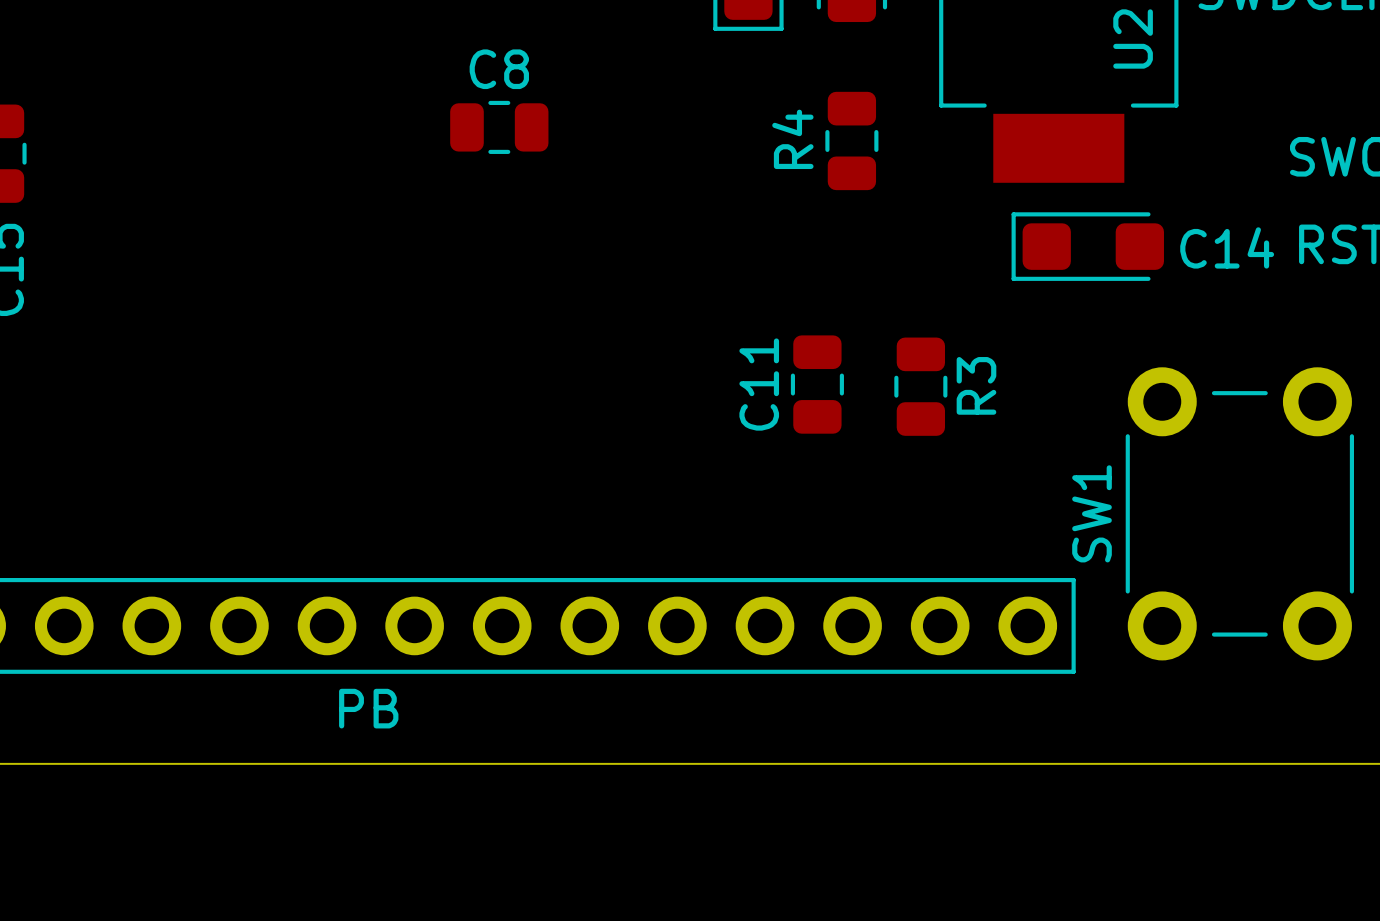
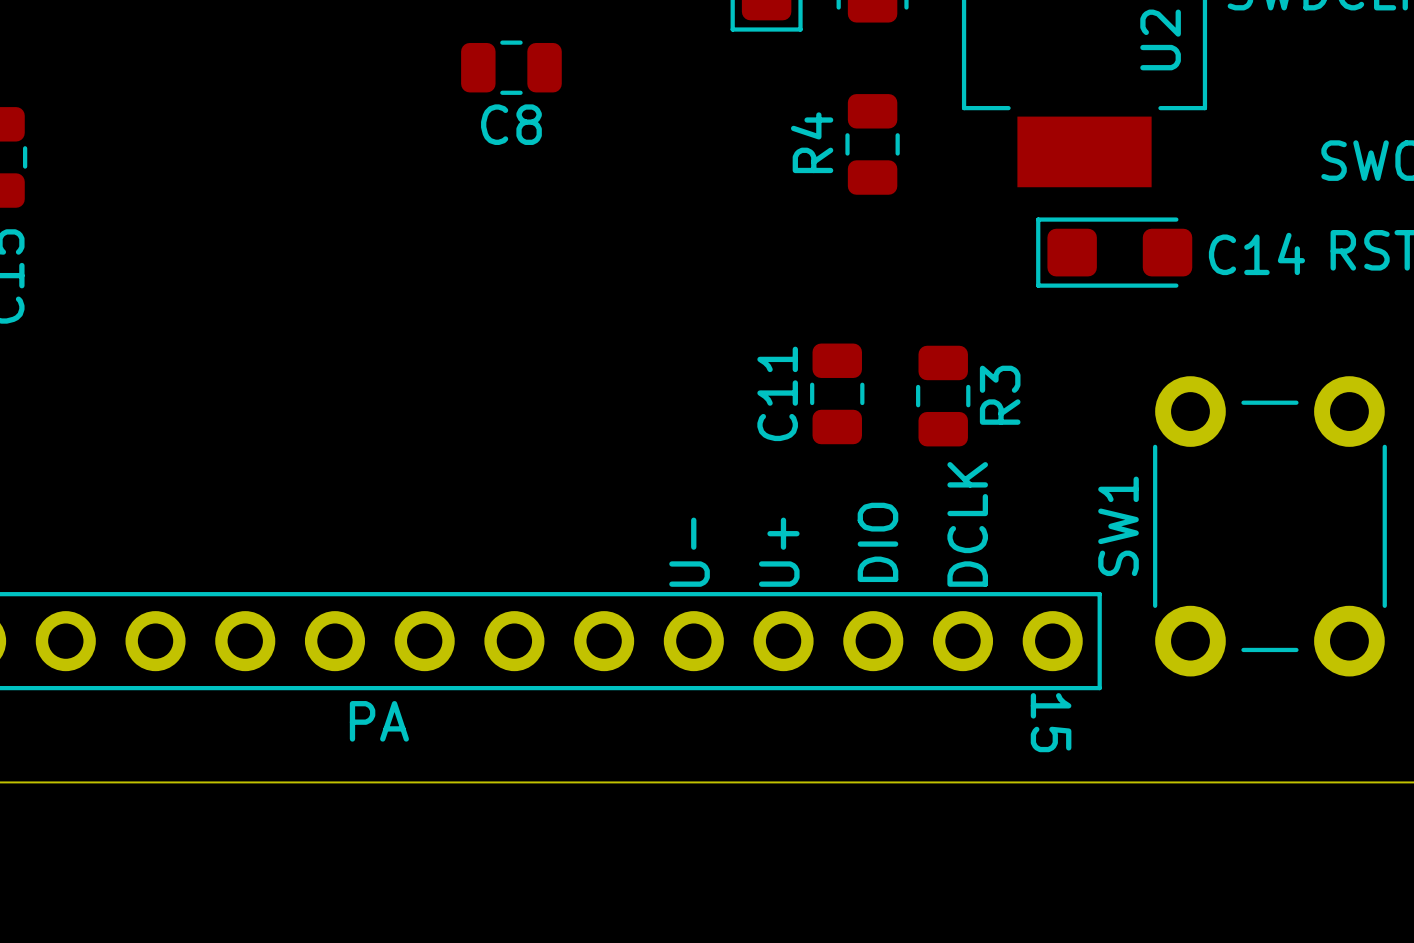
C8 name position: C8 (499, 69) -> C8 (511, 124)
C8 position: (499, 127) -> (511, 67)
text: none -> DCLK (967, 524)
text: none -> DIO (877, 542)
text: none -> U- (689, 552)
text: none -> U+ (779, 552)
text: none -> 15 (1051, 722)
text: PB (368, 708) -> PA (379, 721)

